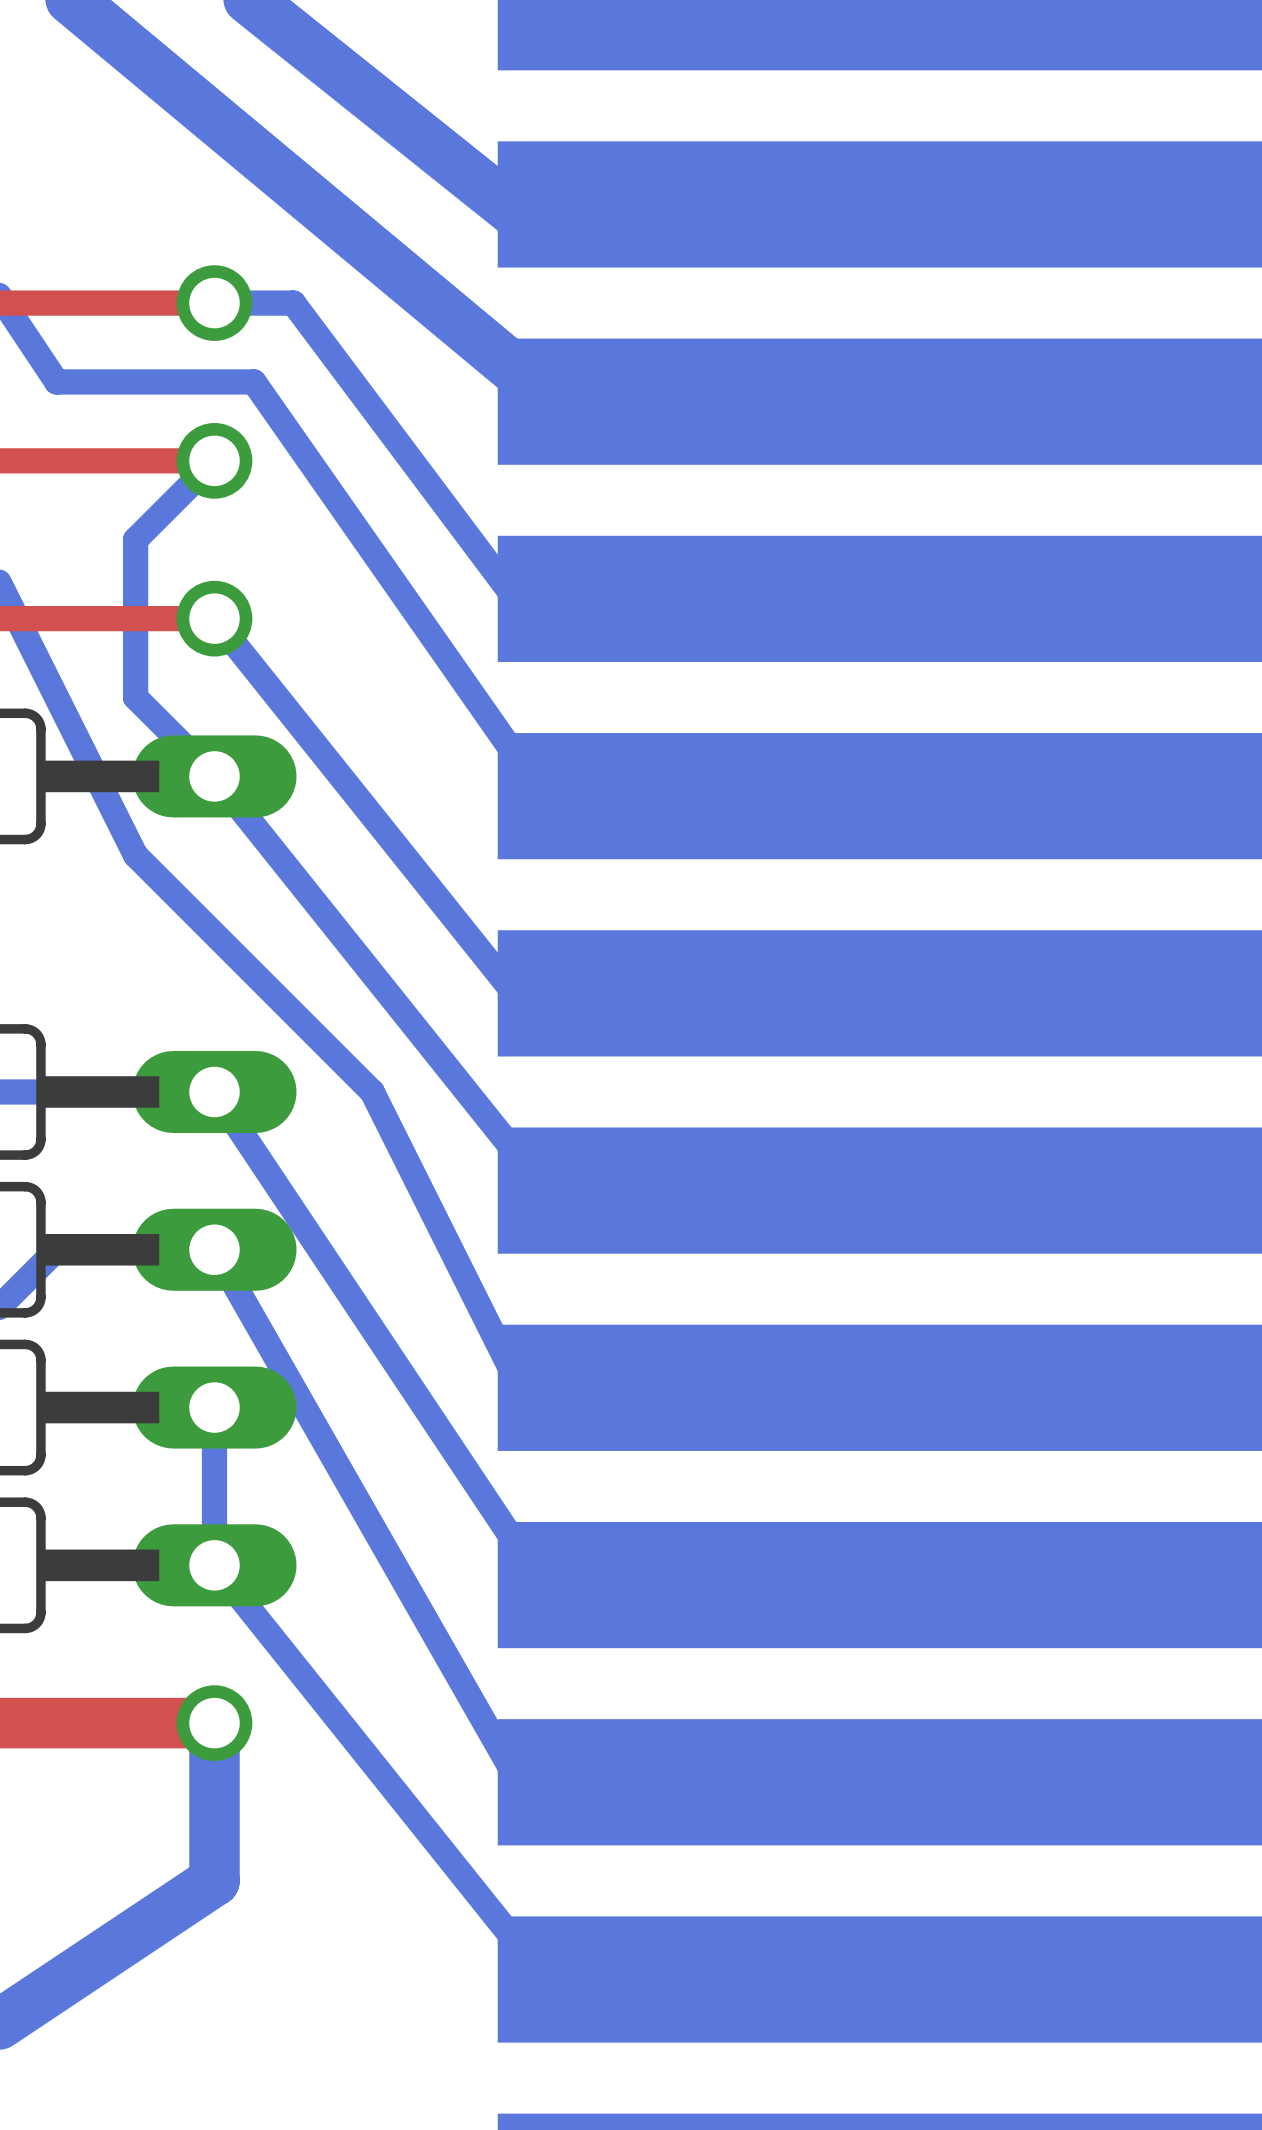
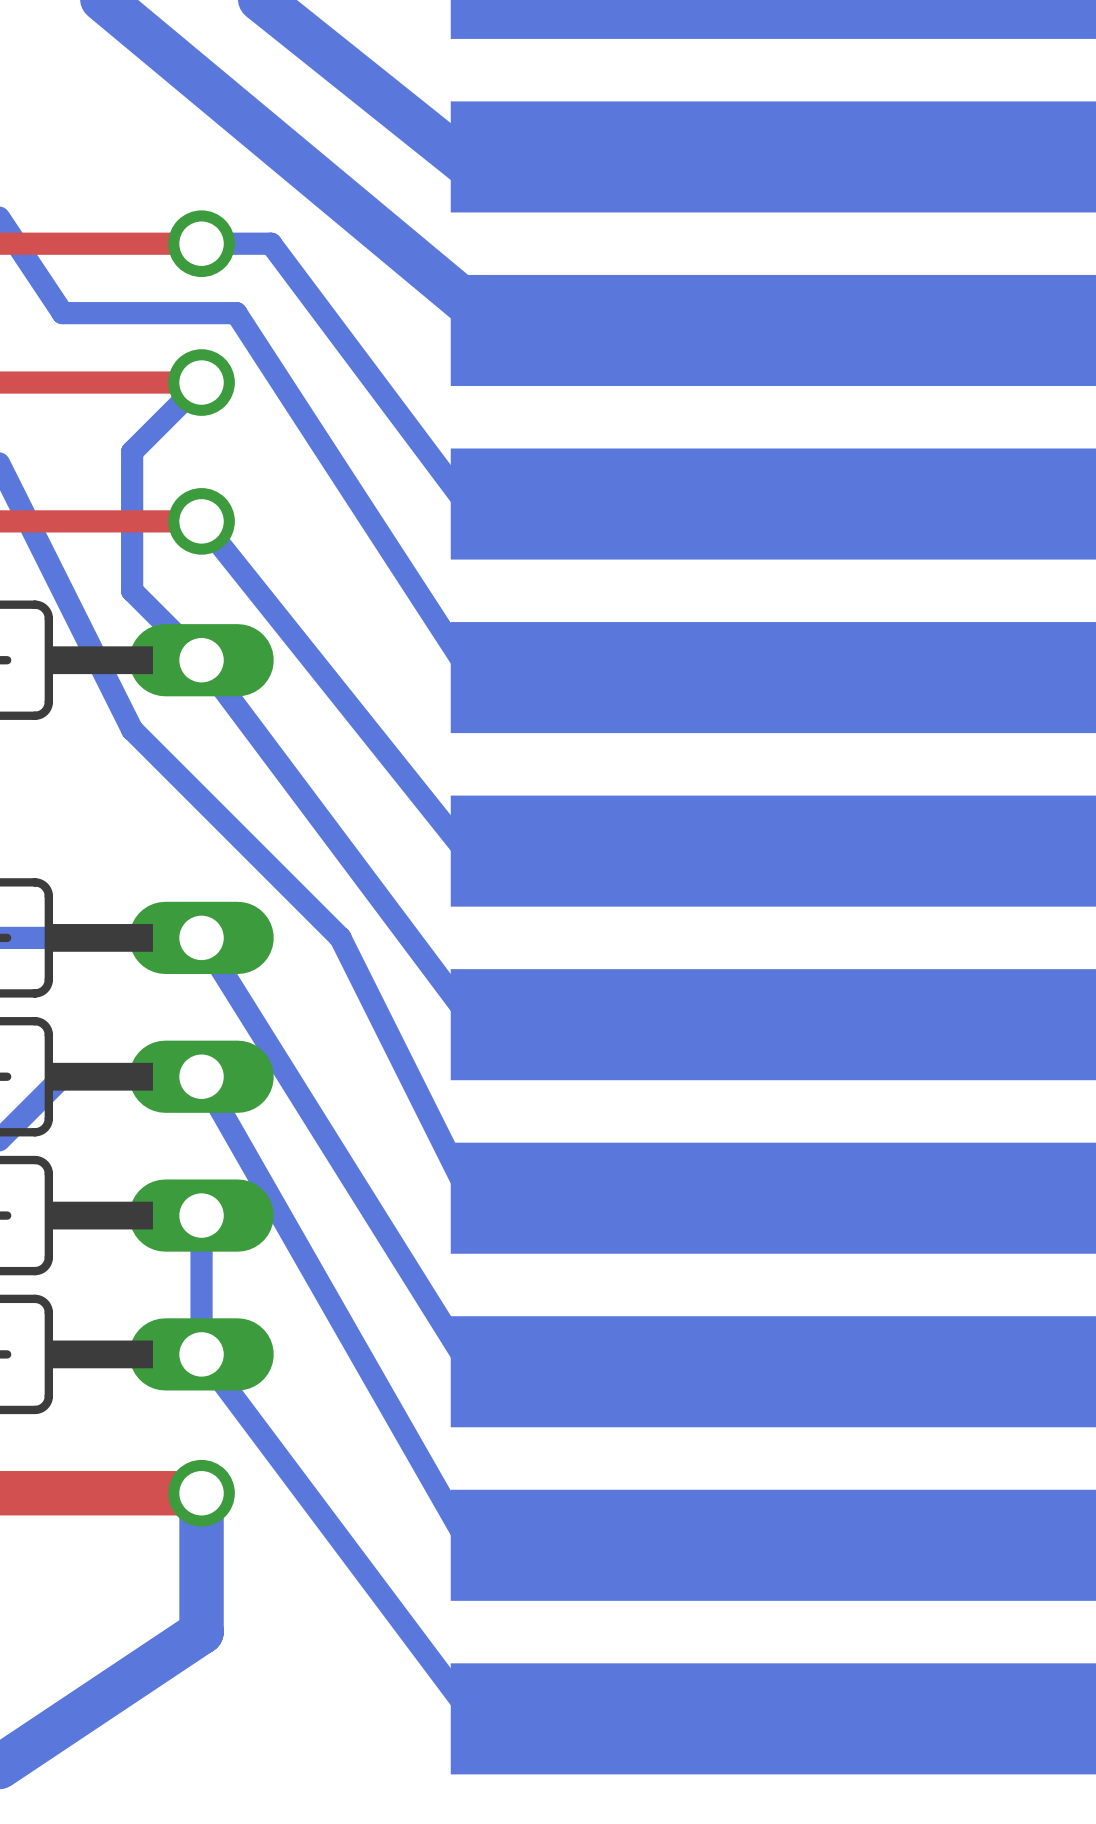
bottom track: (253, 381) (530, 776) (904, 796) -> (236, 313) (461, 660) (808, 677)
bottom track: (214, 776) (530, 1170) (904, 1190) -> (201, 660) (461, 1007) (808, 1024)
bottom track: (214, 1091) (530, 1565) (904, 1585) -> (201, 937) (461, 1354) (808, 1371)
bottom track: (214, 1565) (530, 1959) (904, 1979) -> (201, 1354) (461, 1701) (808, 1718)

